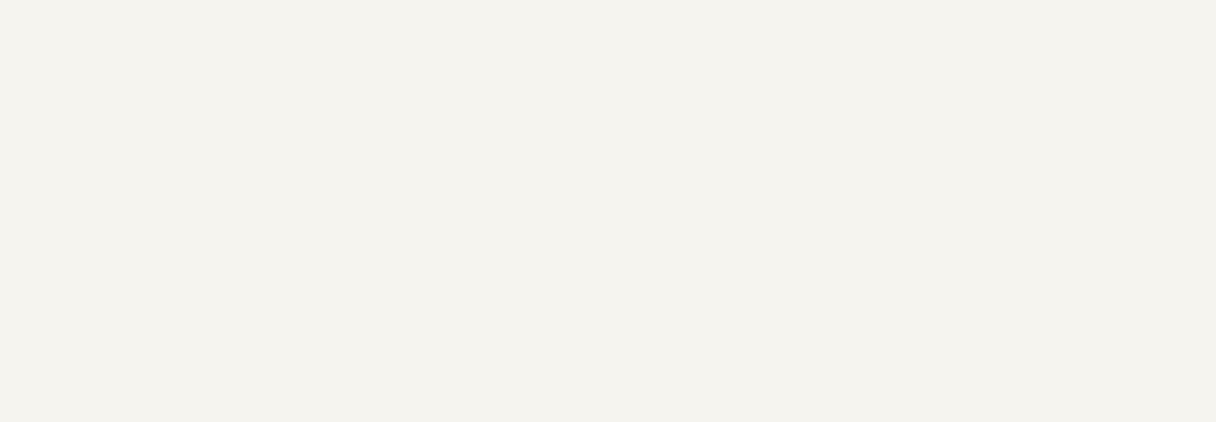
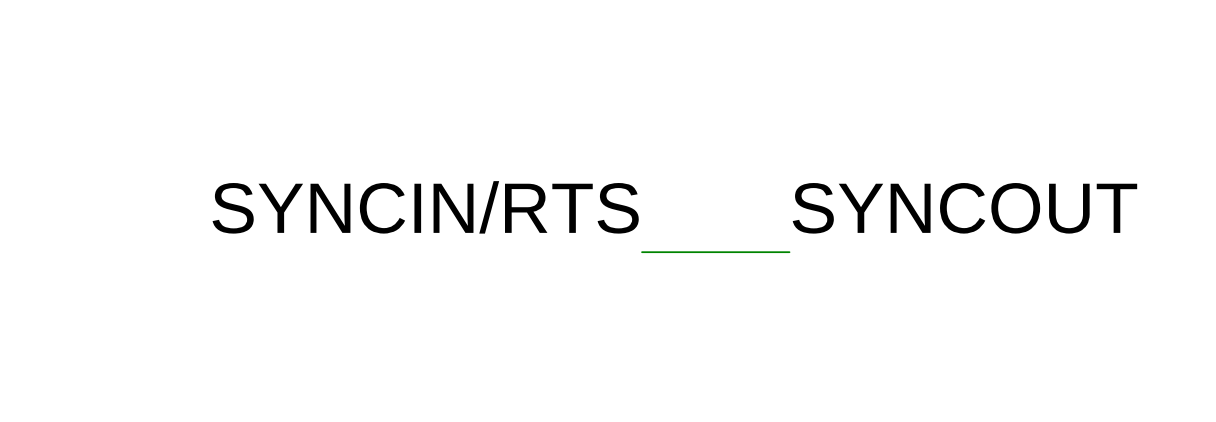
label: none -> SYNCOUT (964, 208)
label: none -> SYNCIN/RTS (425, 207)
wire: none -> (642, 252) (789, 252)

